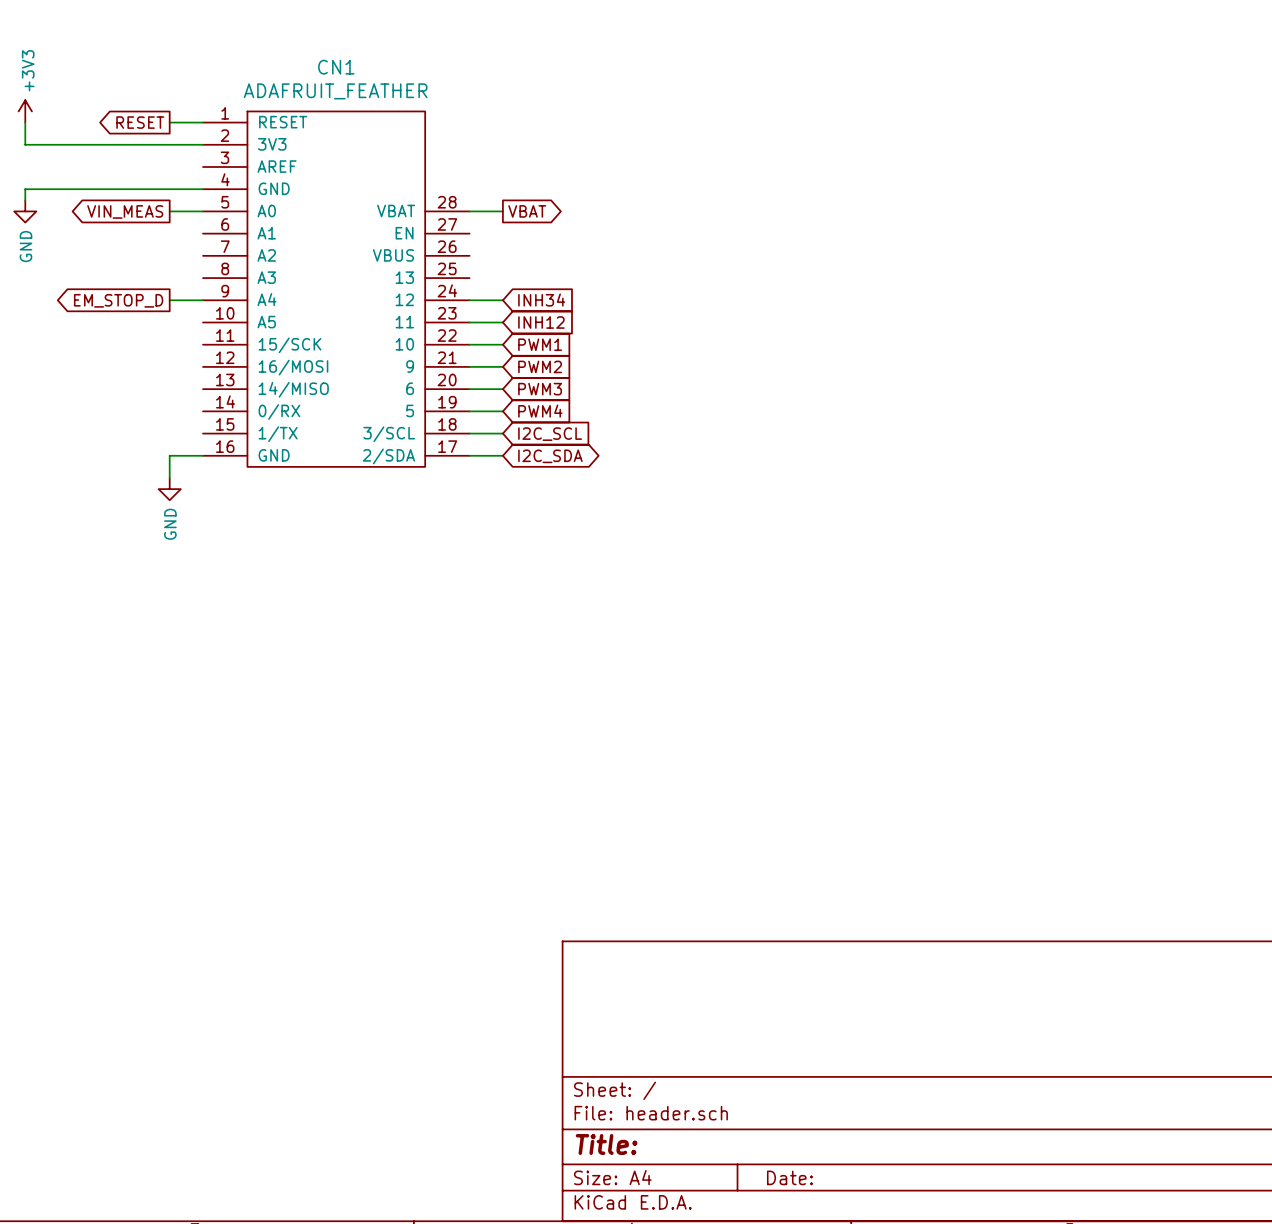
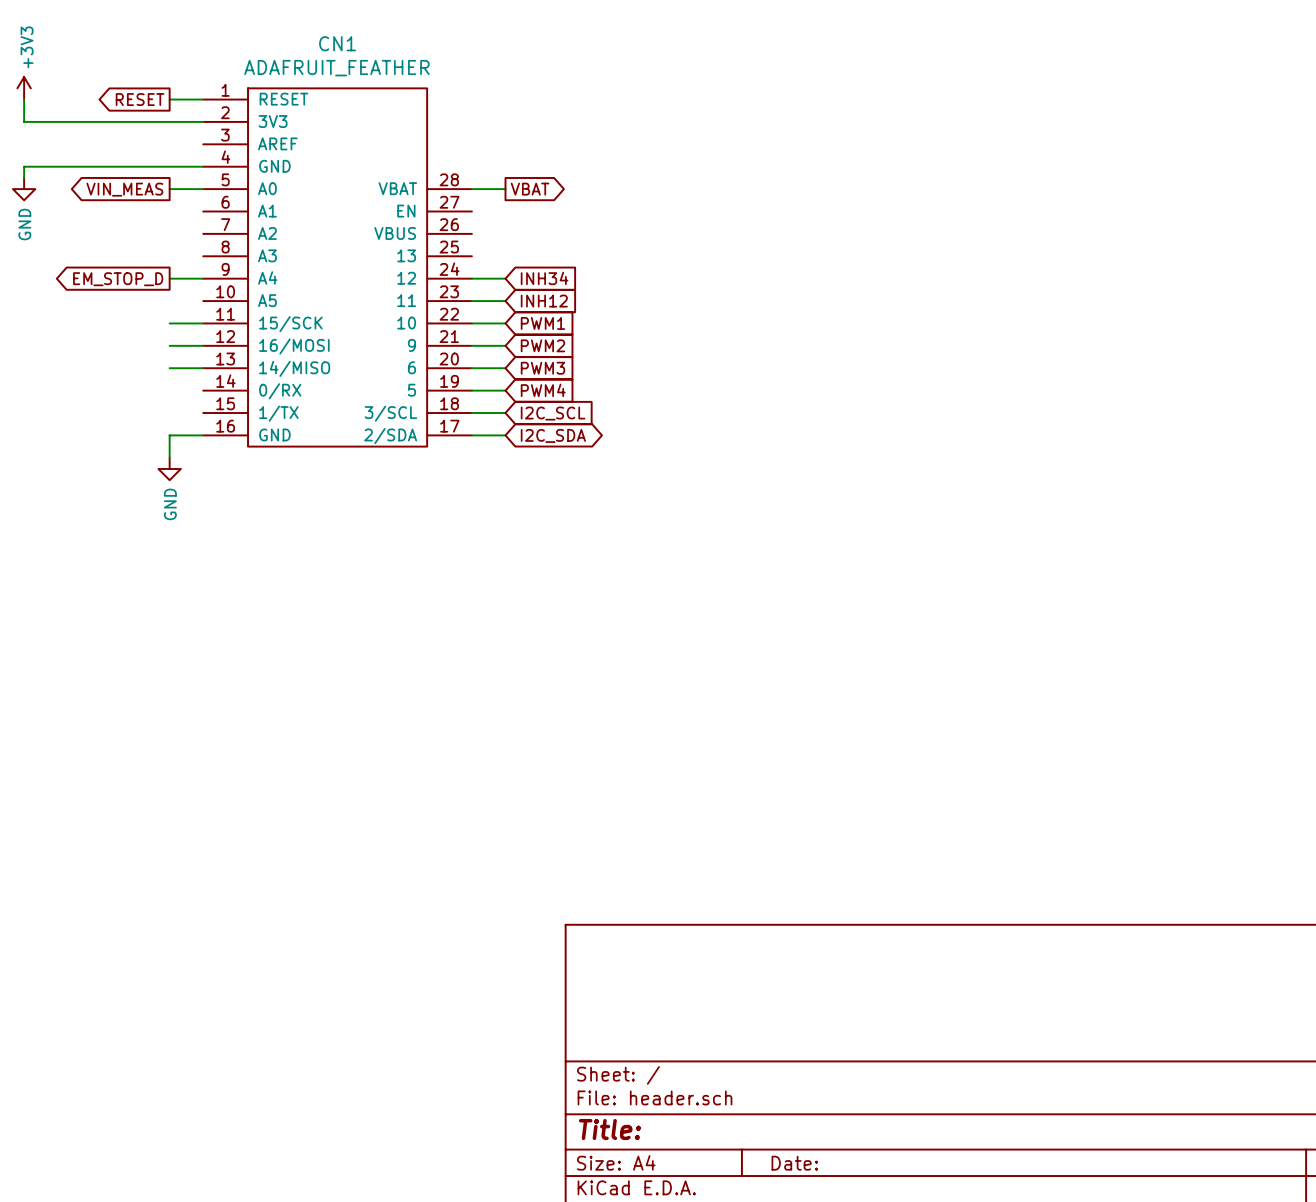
wire: none -> (169, 323) (203, 323)
wire: none -> (169, 345) (203, 345)
wire: none -> (169, 368) (203, 368)

